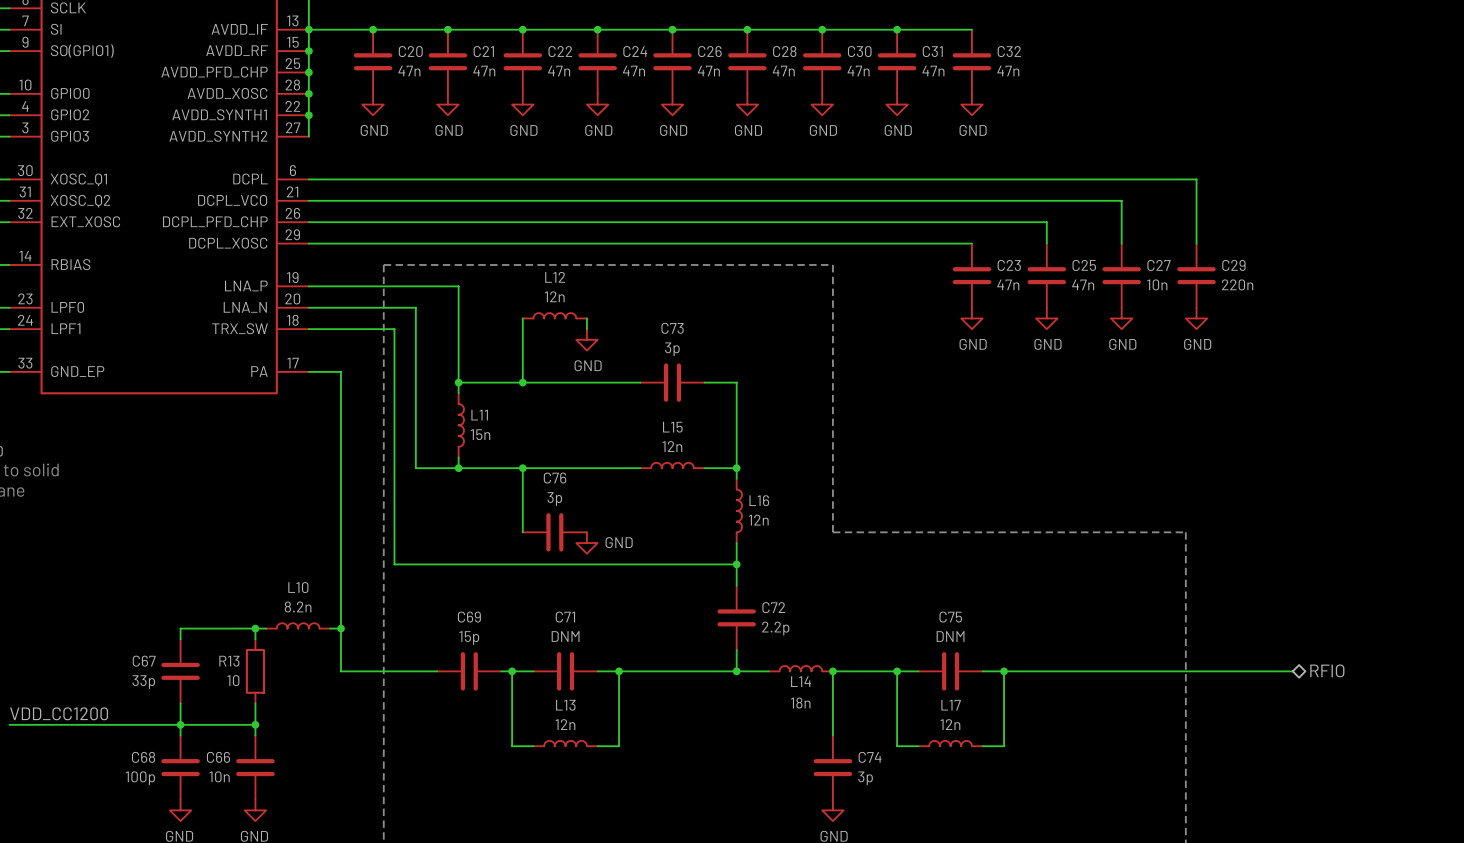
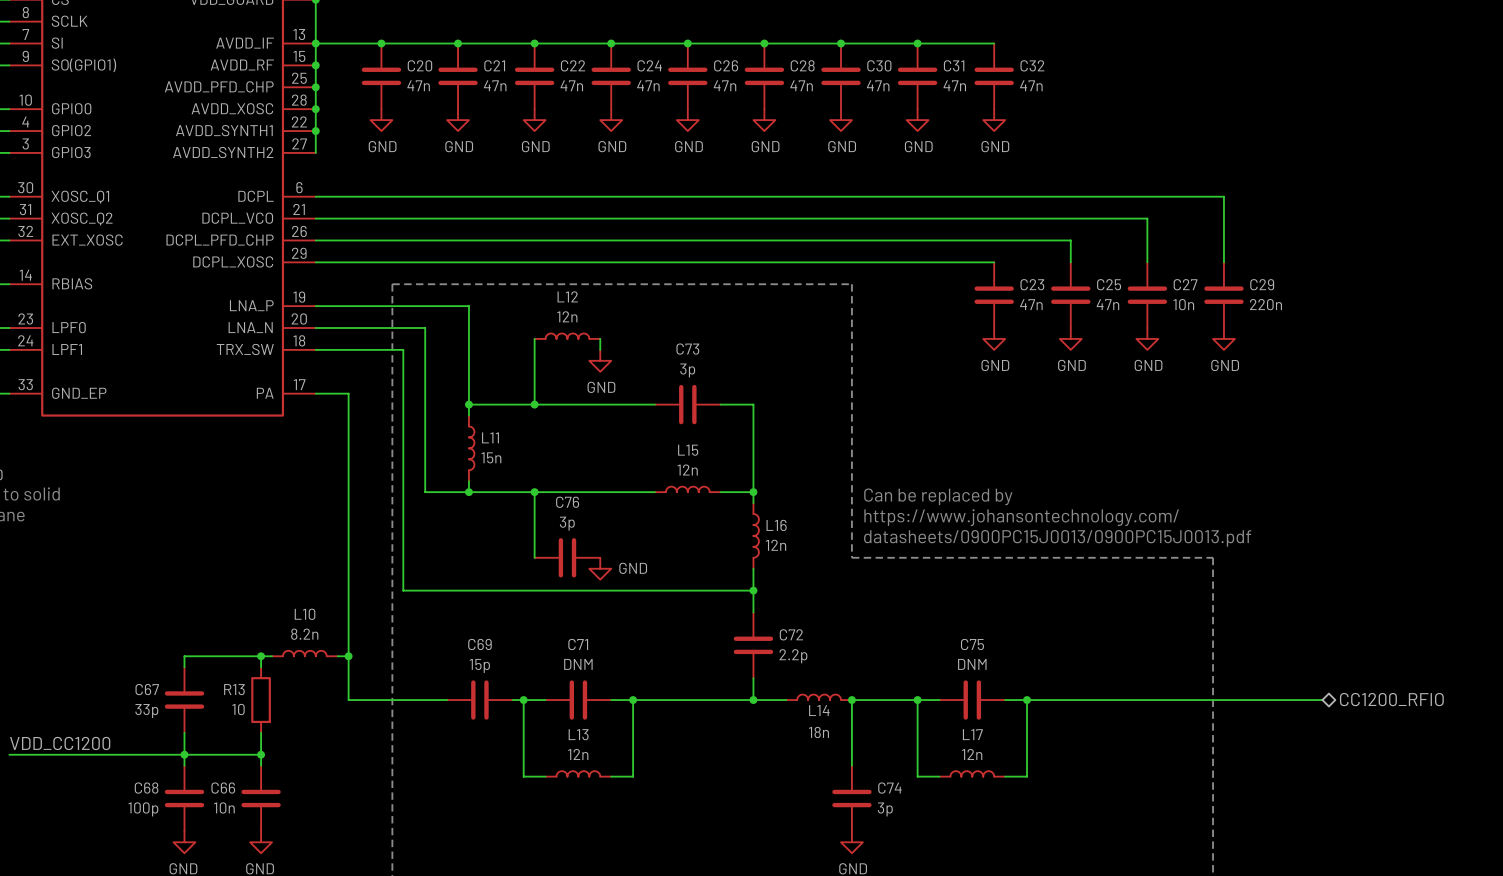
text: none -> Can be replaced by (938, 496)
text: none -> https://www.johansontechnology.com/ (1021, 517)
text: none -> datasheets/0900PC15J0013/0900PC15J0013.pdf (1057, 538)
hierarchical label: RFIO (1327, 670) -> CC1200_RFIO (1391, 699)

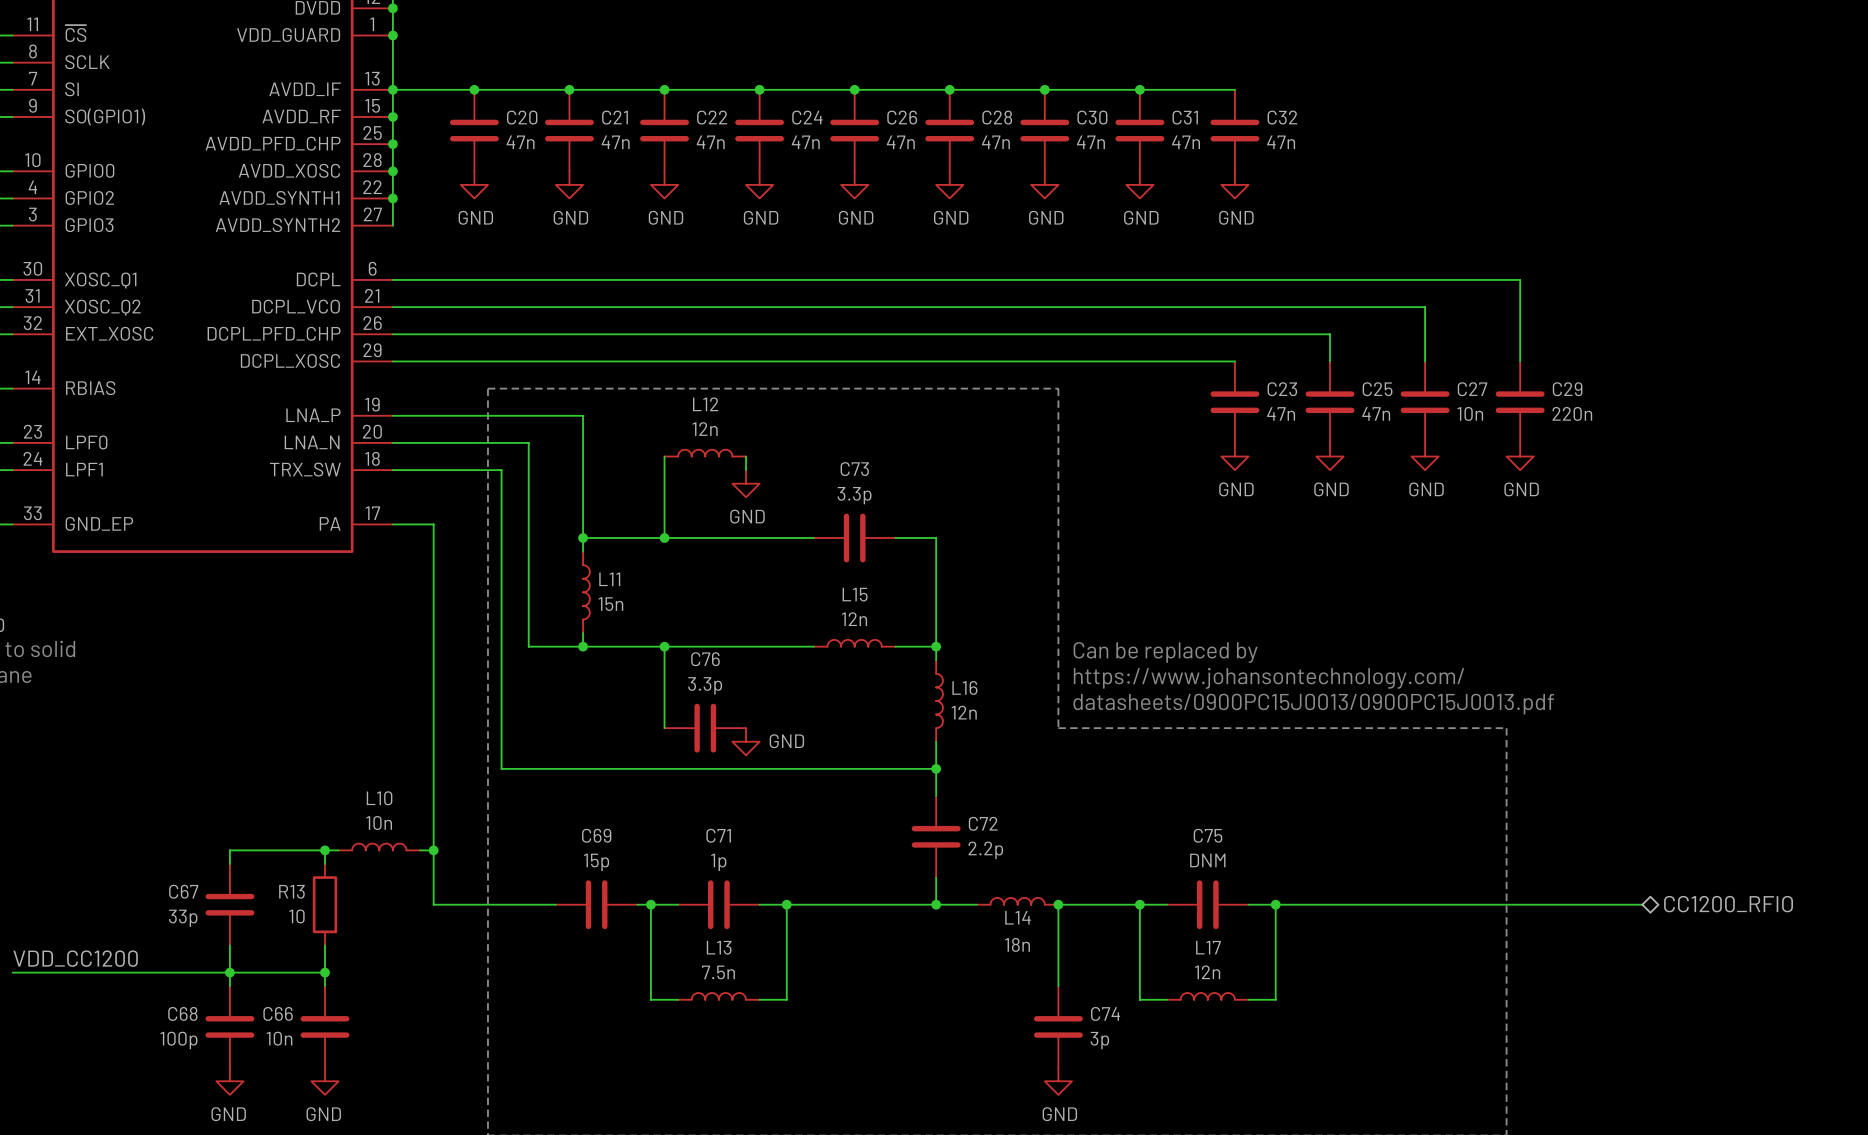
C73 value: 3p (687, 370) -> 3.3p (854, 495)
C76 value: 3p (567, 523) -> 3.3p (705, 685)
L10 value: 8.2n (304, 634) -> 10n (379, 822)
C71 value: DNM (578, 664) -> 1p (718, 862)
L13 value: 12n (578, 754) -> 7.5n (718, 972)

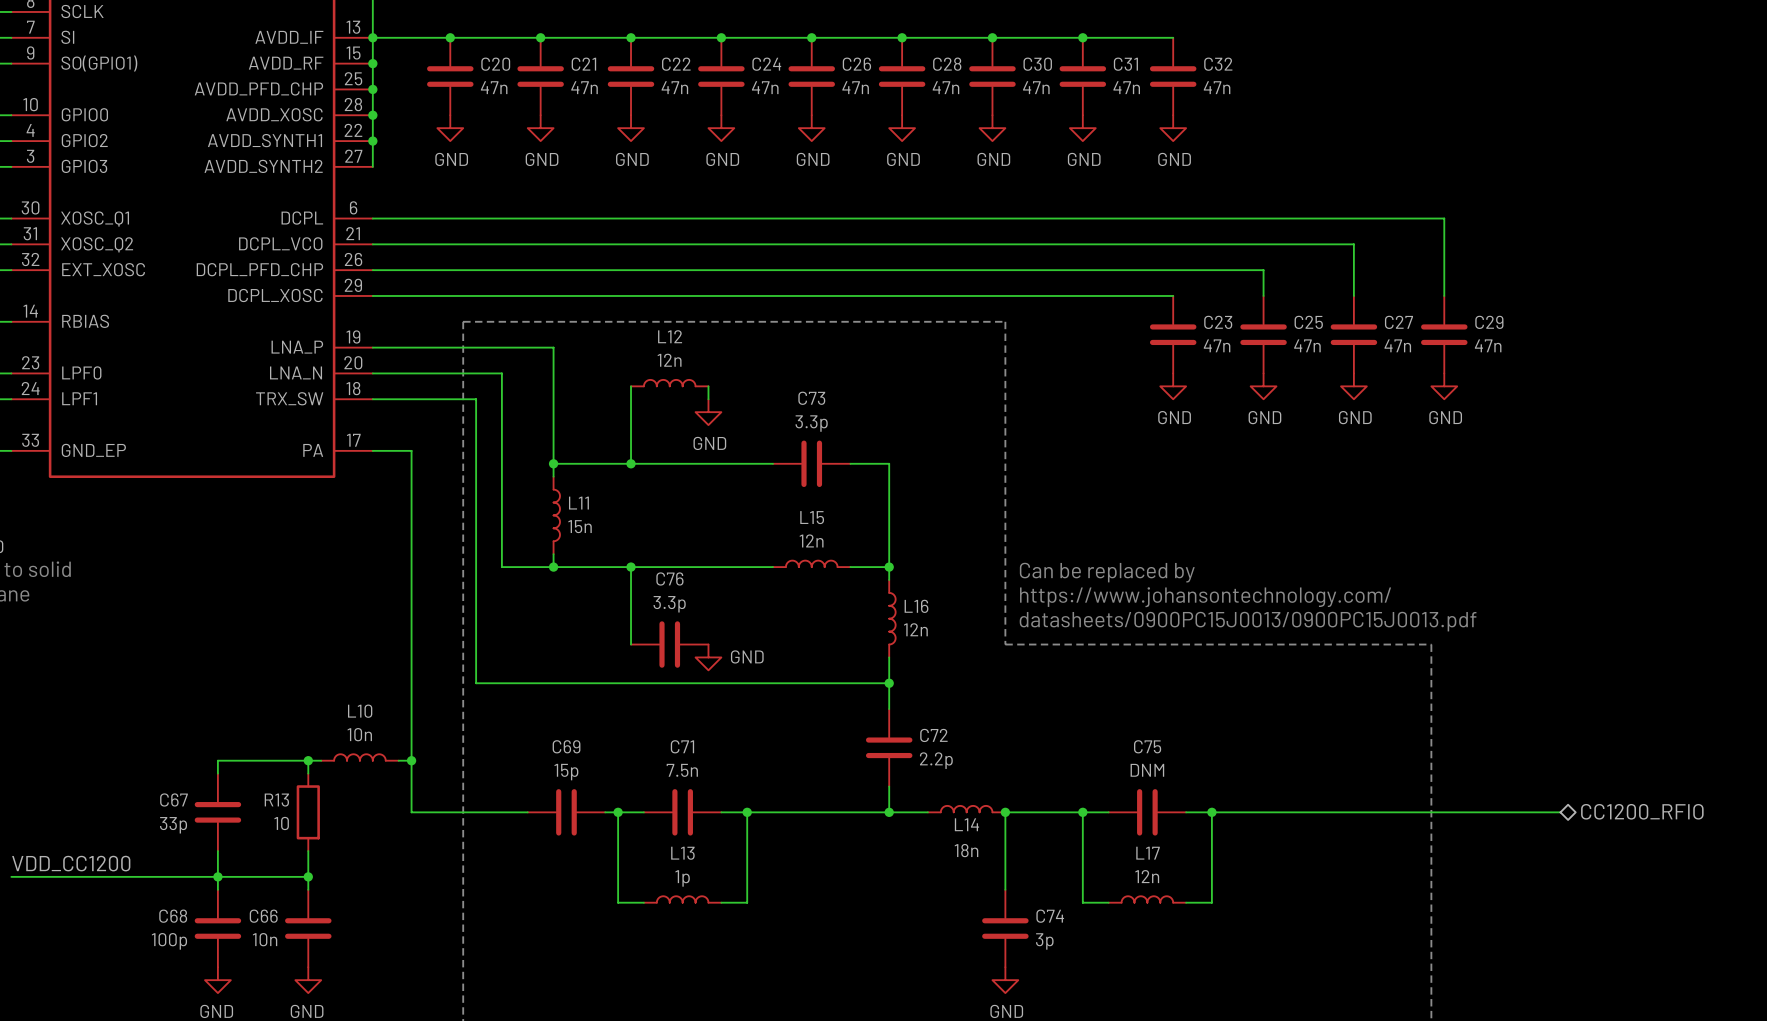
C27 value: 10n (1470, 413) -> 47n (1397, 345)
C29 value: 220n (1572, 413) -> 47n (1488, 345)
C71 value: 1p (718, 862) -> 7.5n (682, 770)
L13 value: 7.5n (718, 972) -> 1p (682, 878)

